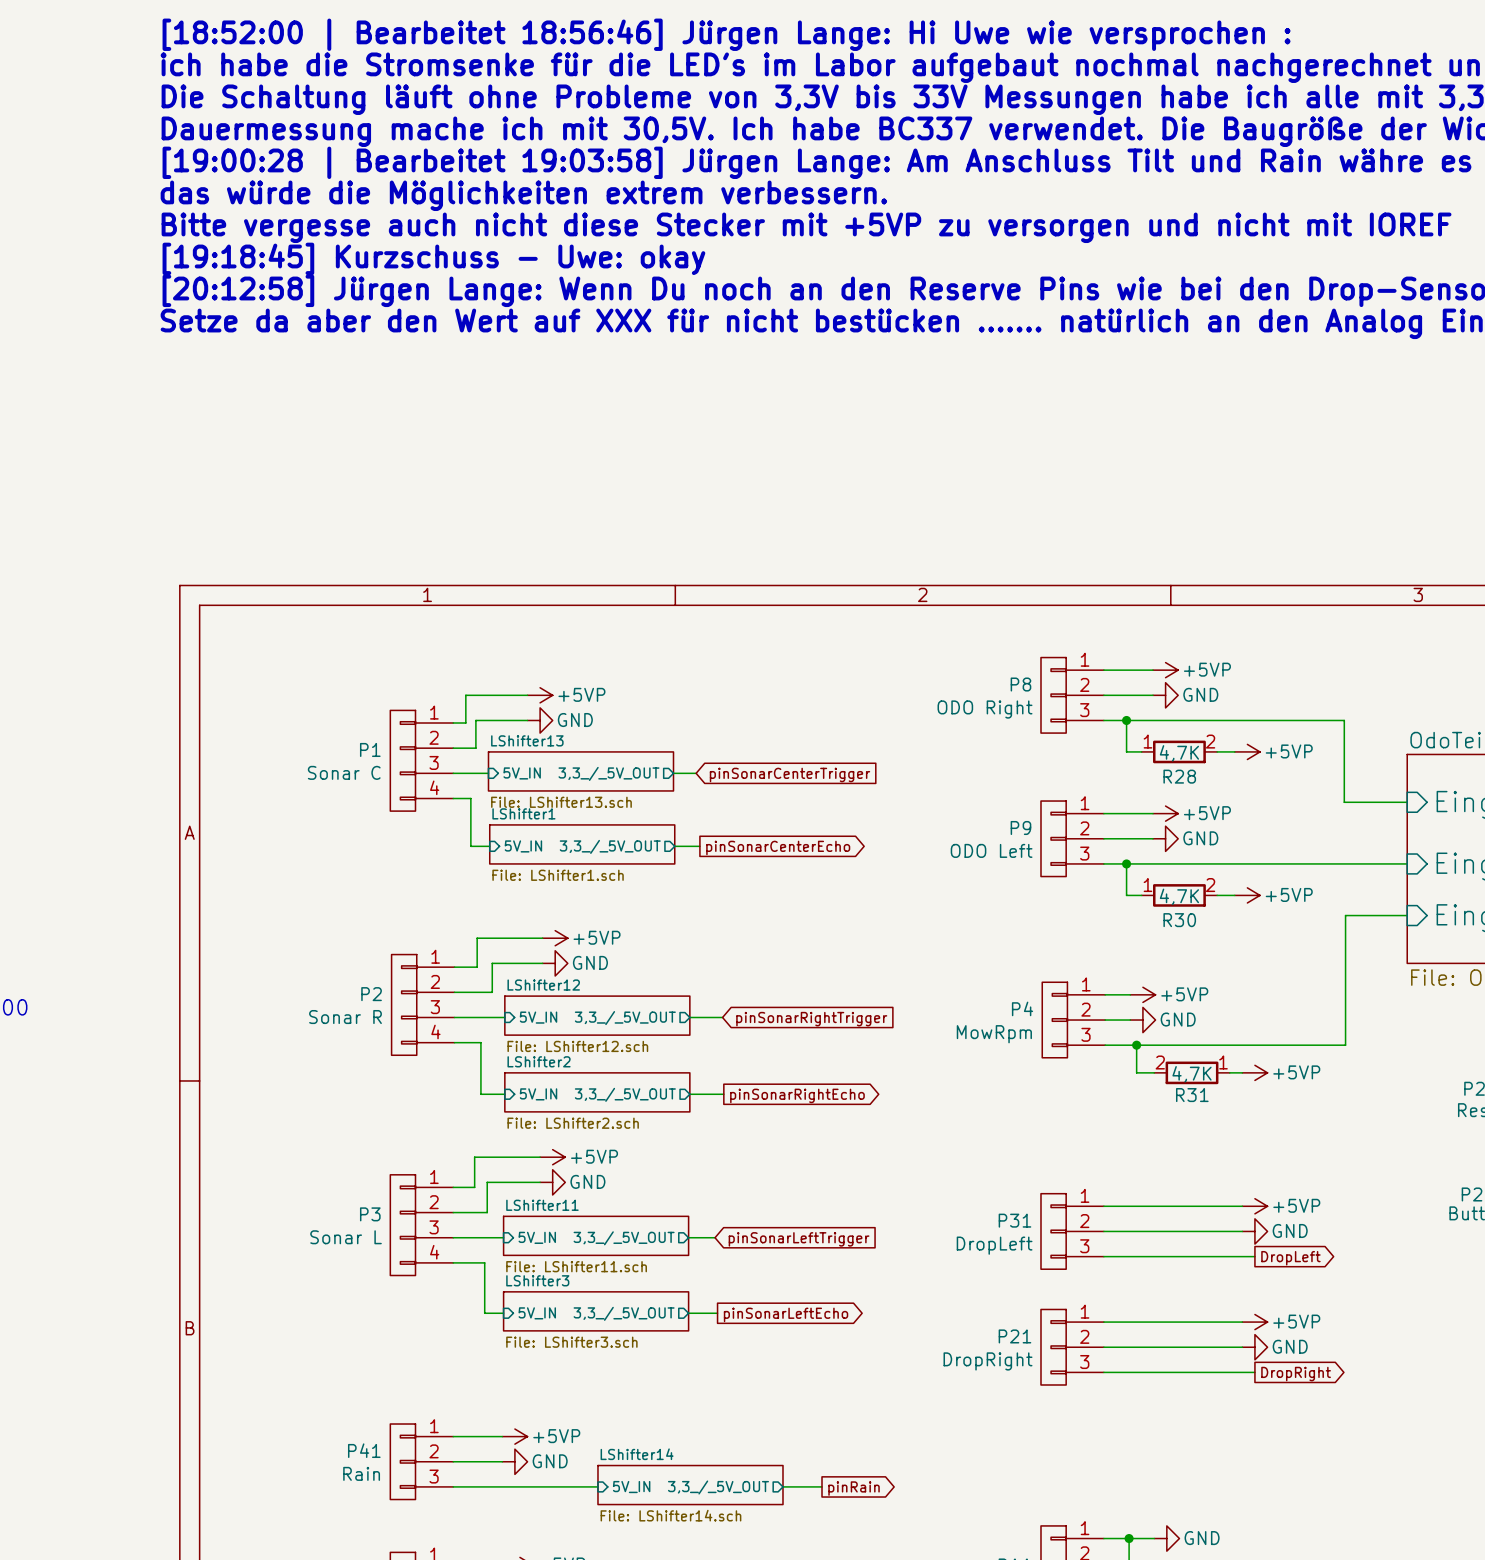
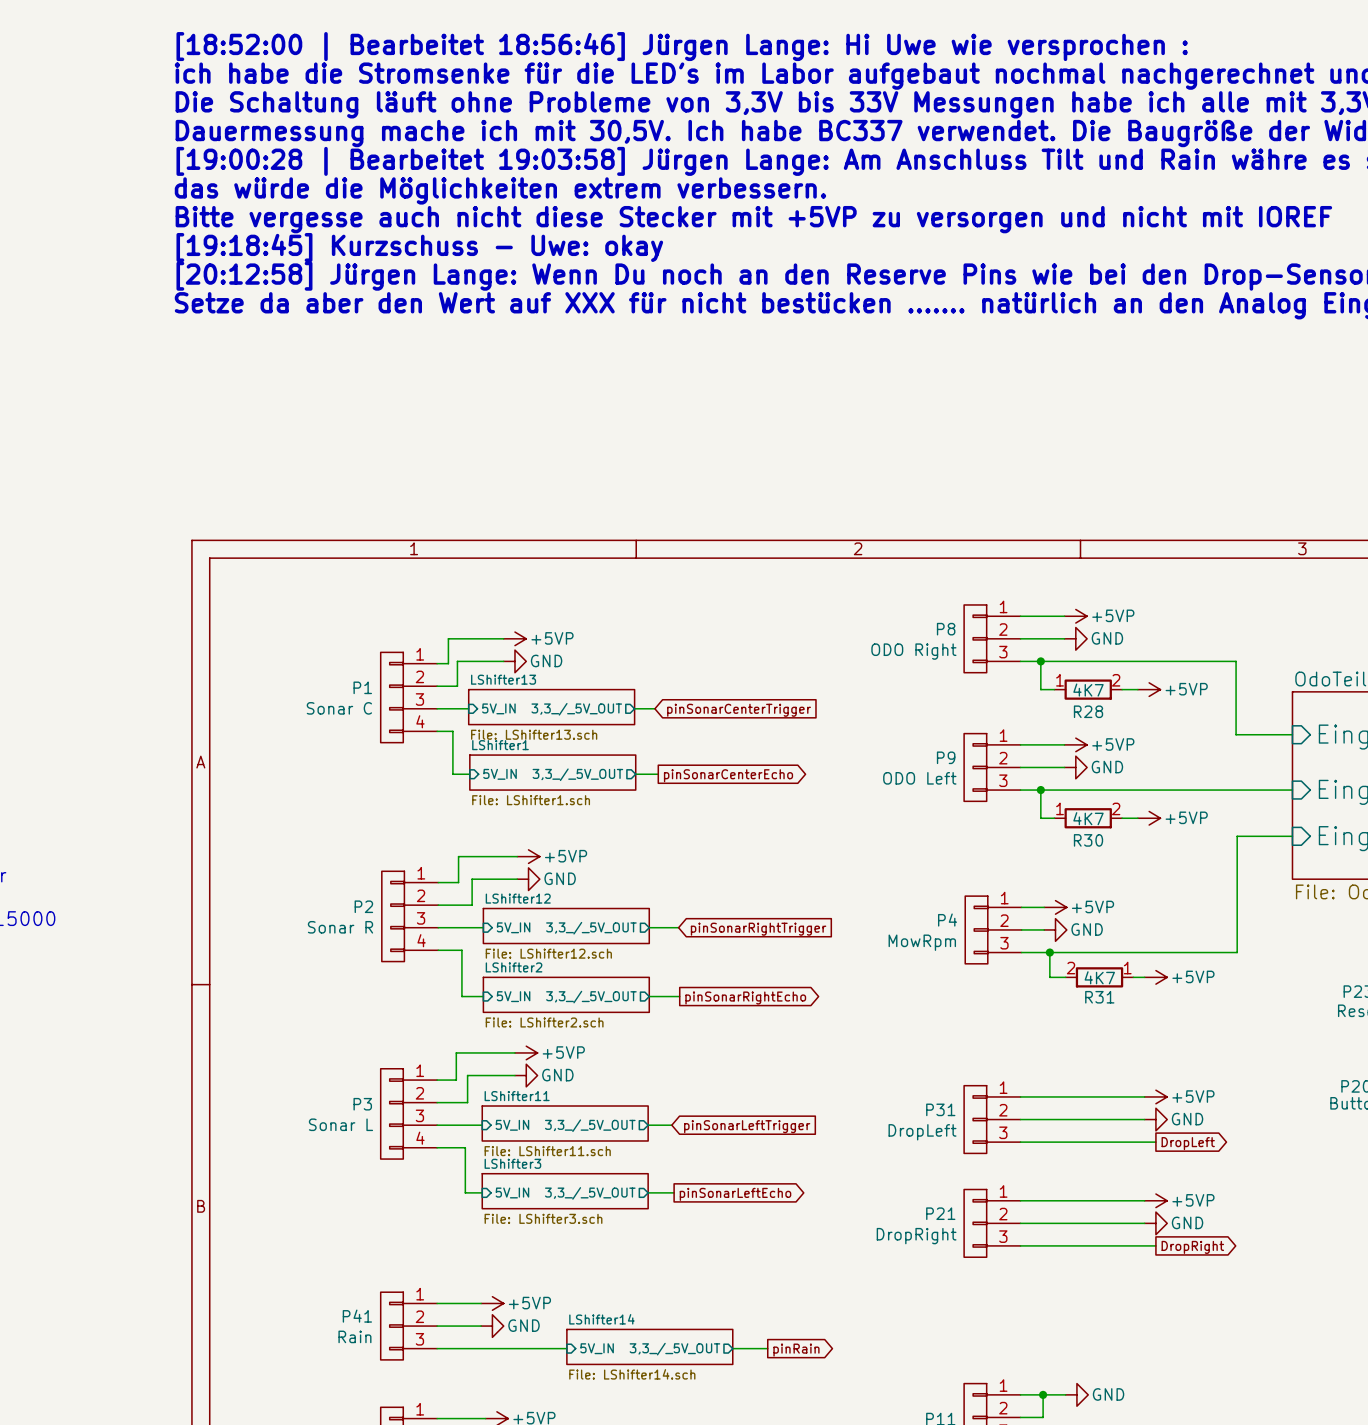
R28 value: 4,7K (1179, 753) -> 4K7 (1088, 690)
R30 value: 4,7K (1179, 896) -> 4K7 (1088, 818)
R31 value: 4,7K (1192, 1074) -> 4K7 (1099, 977)

